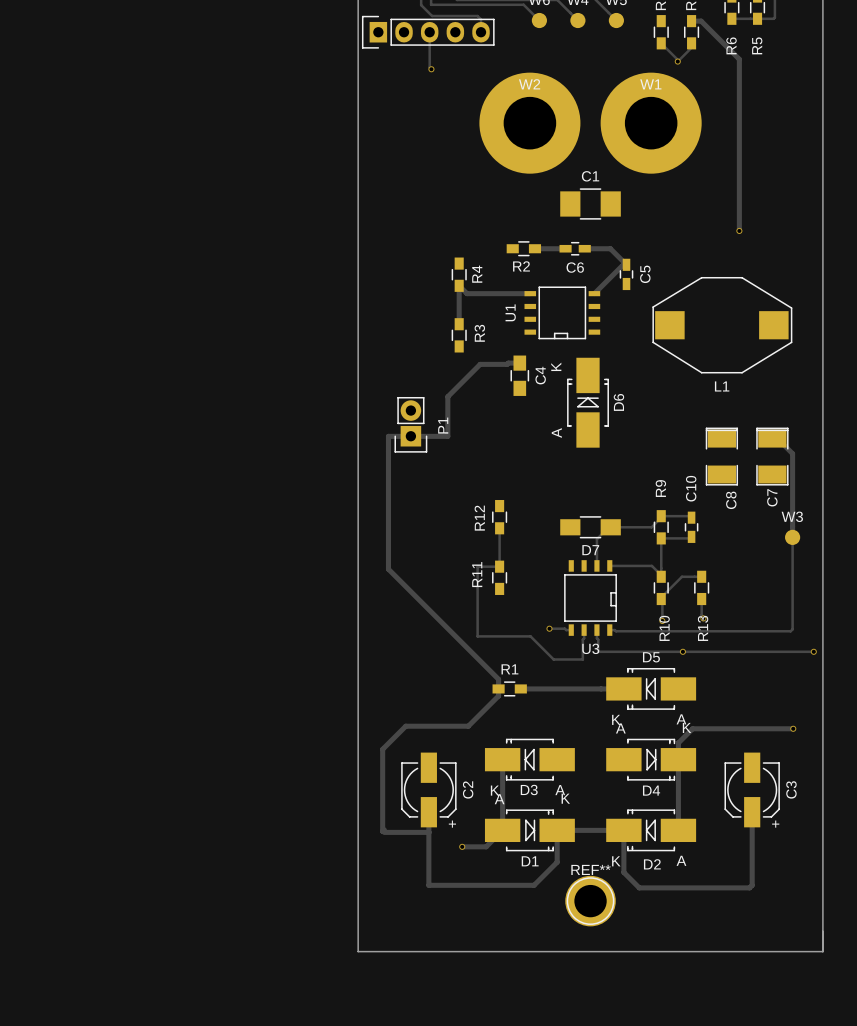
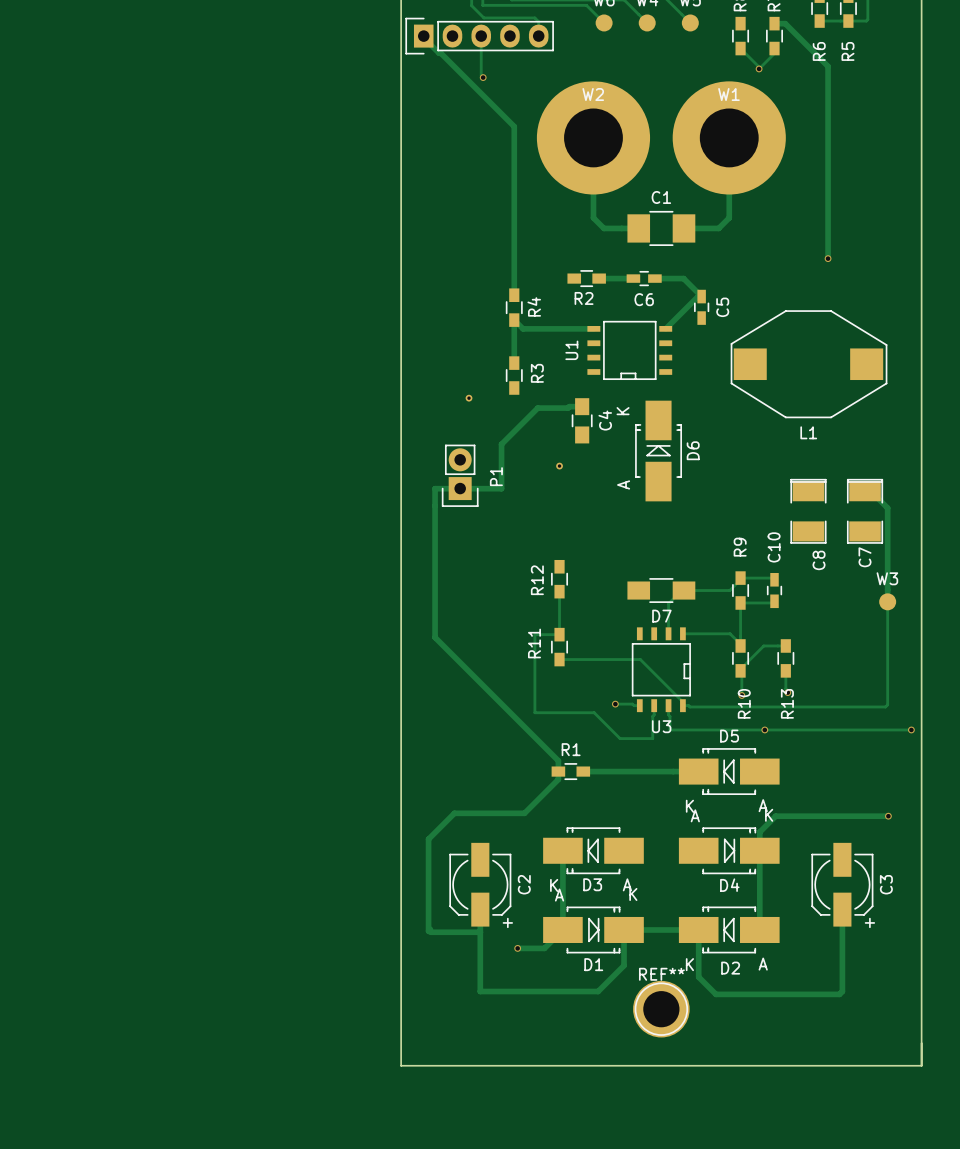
track: none -> (423, 36) (514, 126) (514, 295)
track: none -> (593, 137) (593, 217) (603, 228) (638, 228)
track: none -> (729, 137) (729, 217) (718, 228) (683, 228)
part: none -> (469, 398)
part: none -> (559, 466)
track: none -> (559, 659) (640, 659) (682, 702) (682, 705)

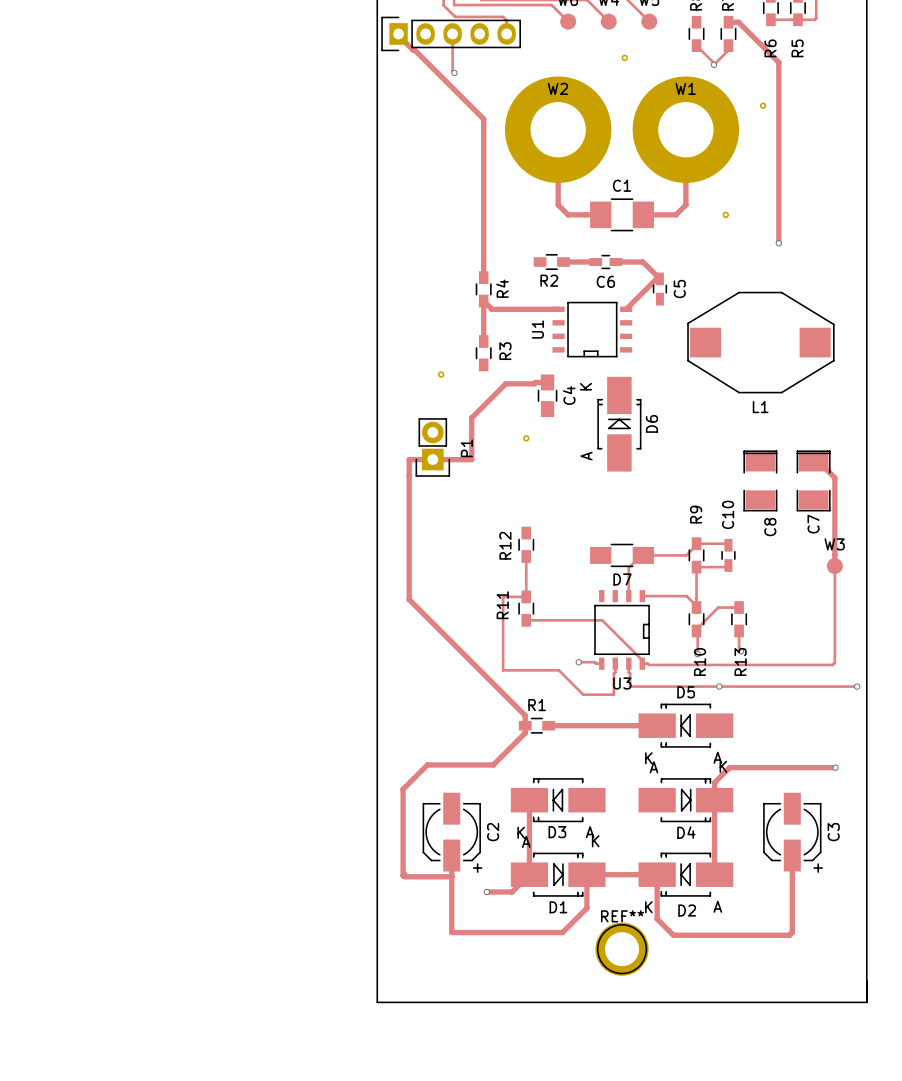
part: none -> (624, 57)
part: none -> (763, 105)
part: none -> (725, 214)

